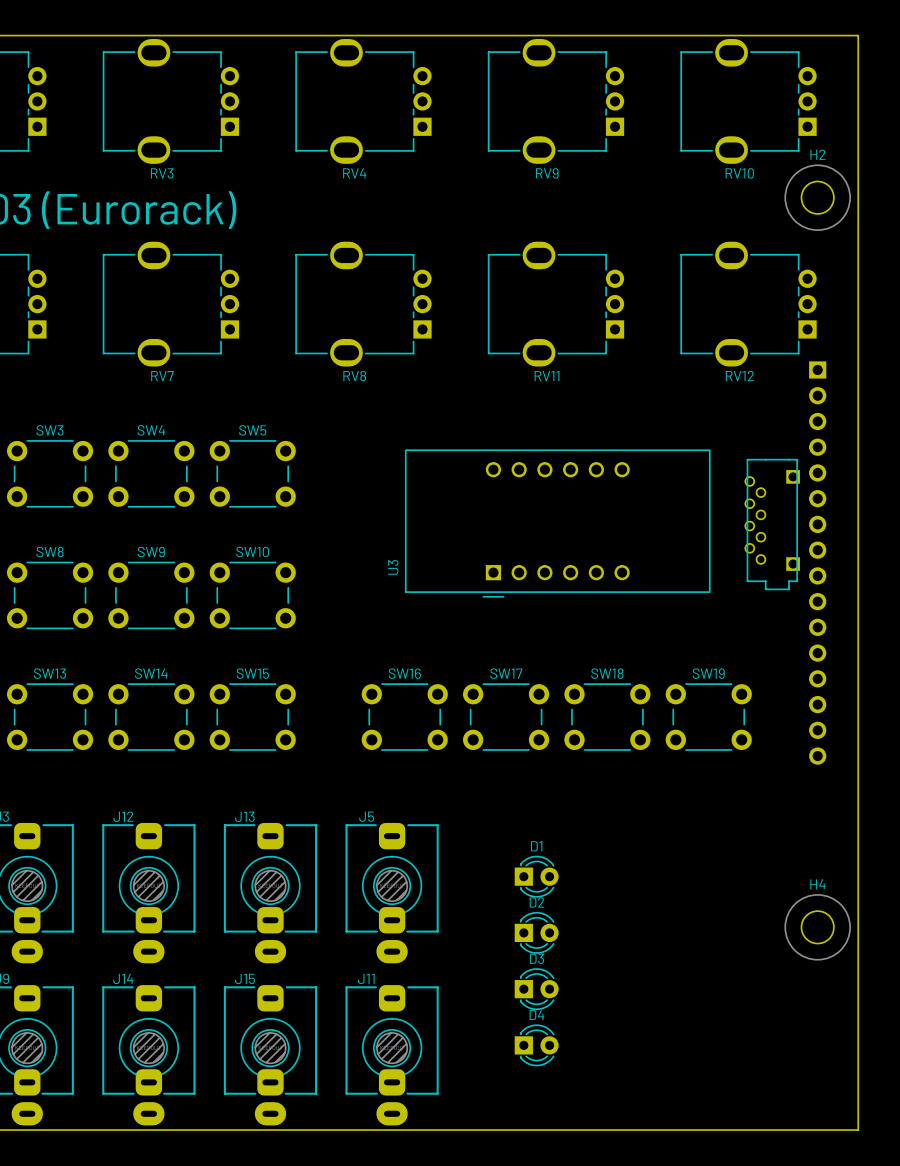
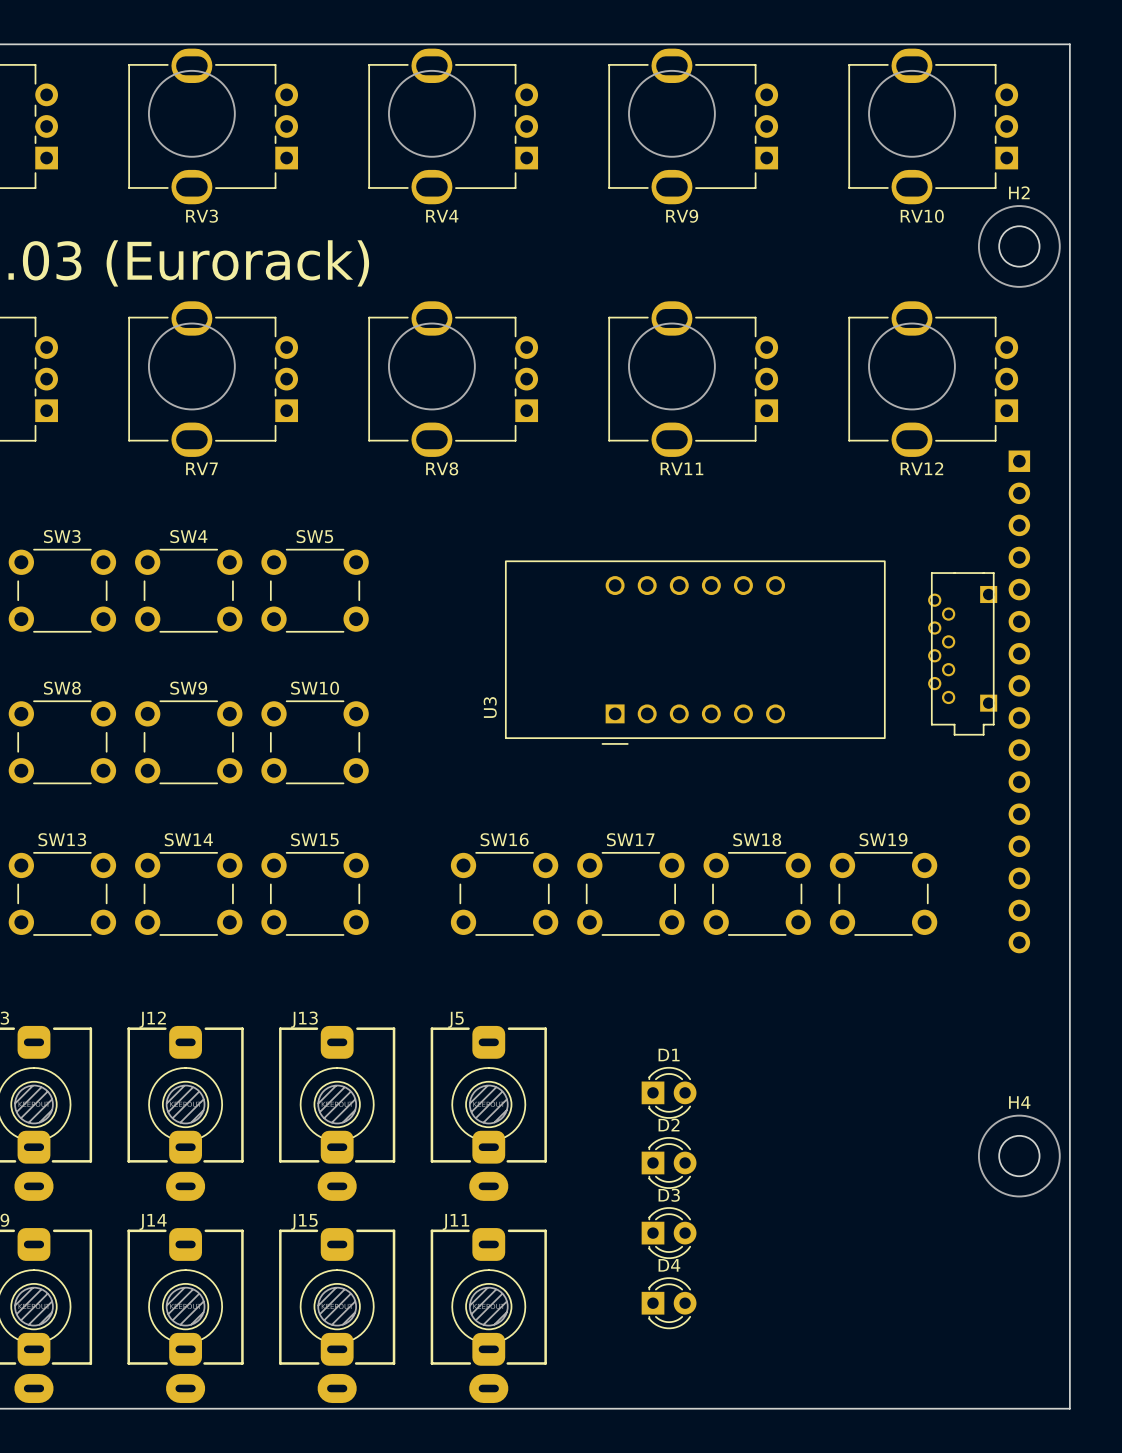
drawing: none -> [147, 69, 236, 158]
drawing: none -> [388, 69, 476, 158]
drawing: none -> [628, 69, 716, 158]
drawing: none -> [868, 69, 956, 158]
drawing: none -> [147, 322, 236, 411]
drawing: none -> [388, 322, 476, 411]
drawing: none -> [628, 322, 716, 411]
drawing: none -> [868, 322, 956, 411]

